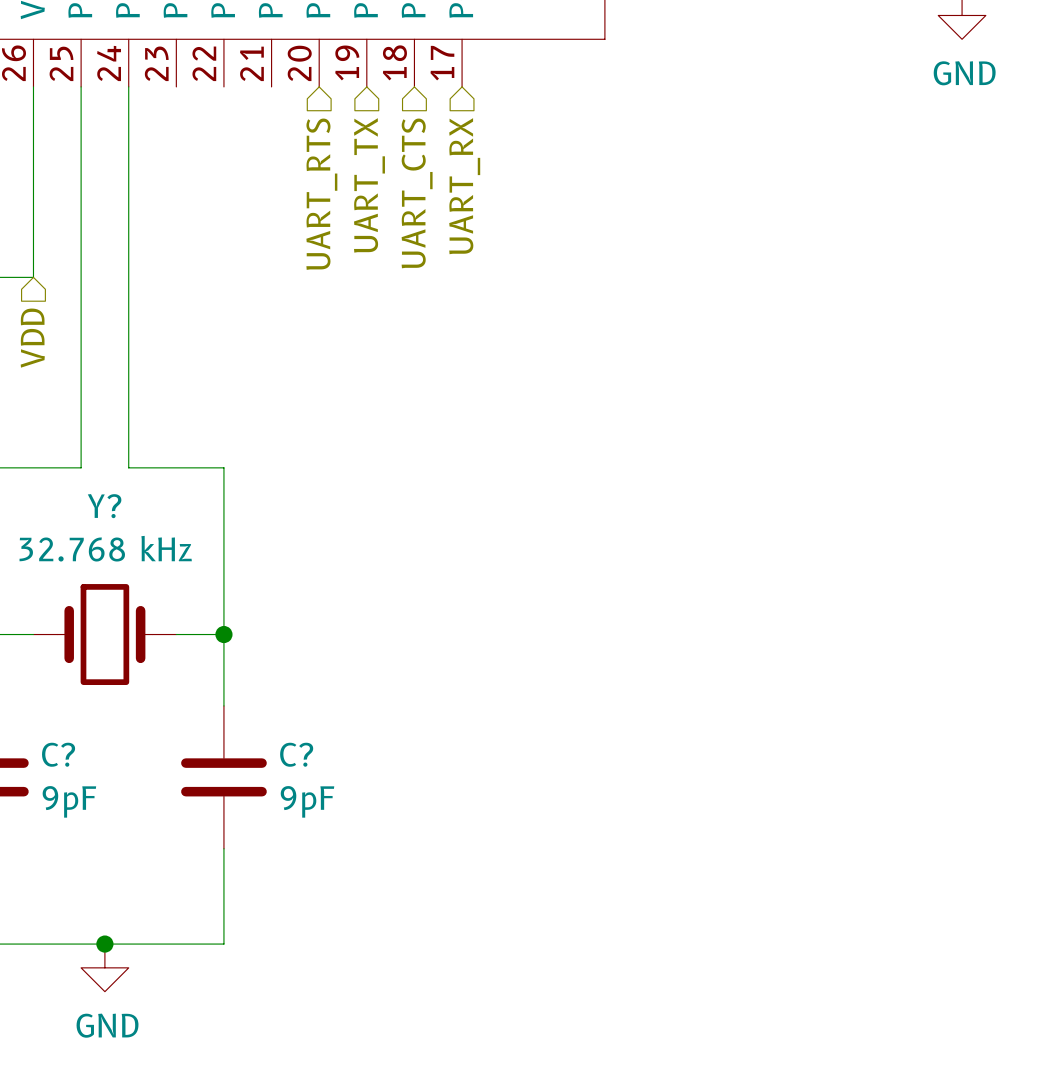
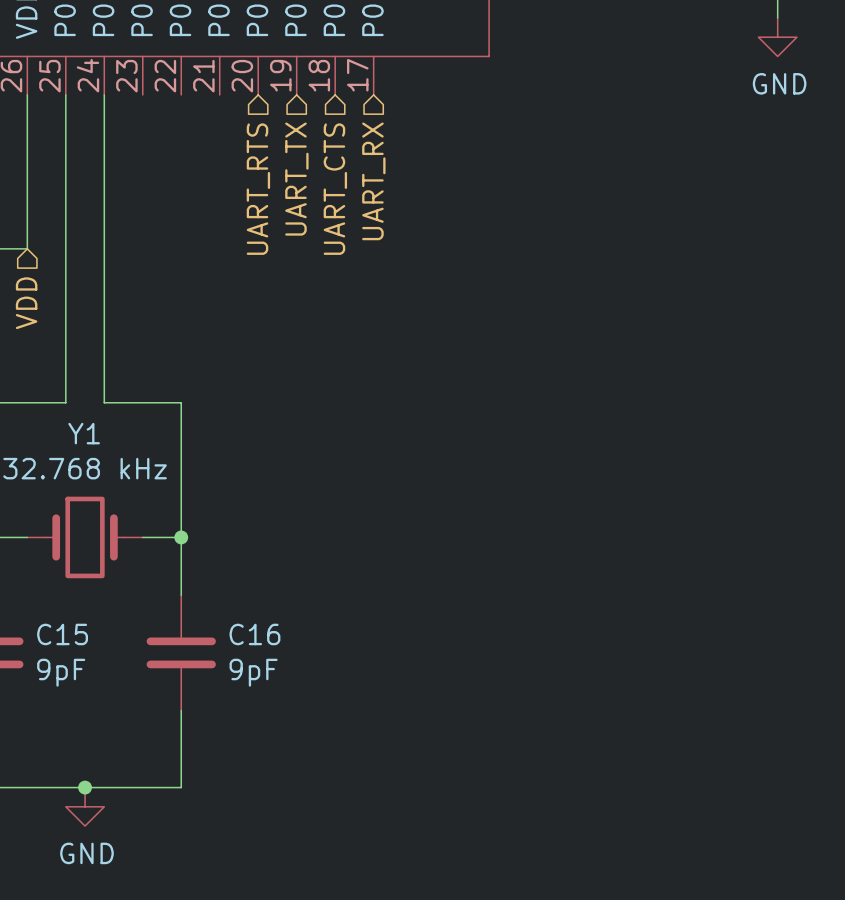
Y? name: Y? (104, 506) -> Y1 (84, 433)
C? name: C? (58, 754) -> C15 (62, 634)
C? name: C? (296, 754) -> C16 (254, 634)

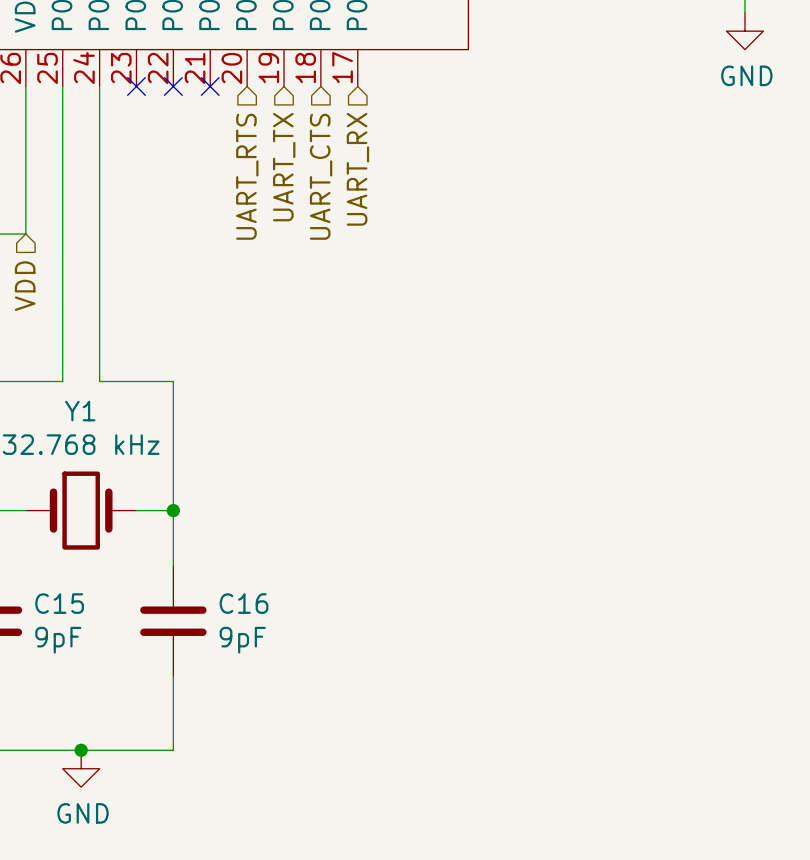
no-connect mark: none -> (136, 86)
no-connect mark: none -> (173, 86)
no-connect mark: none -> (210, 86)

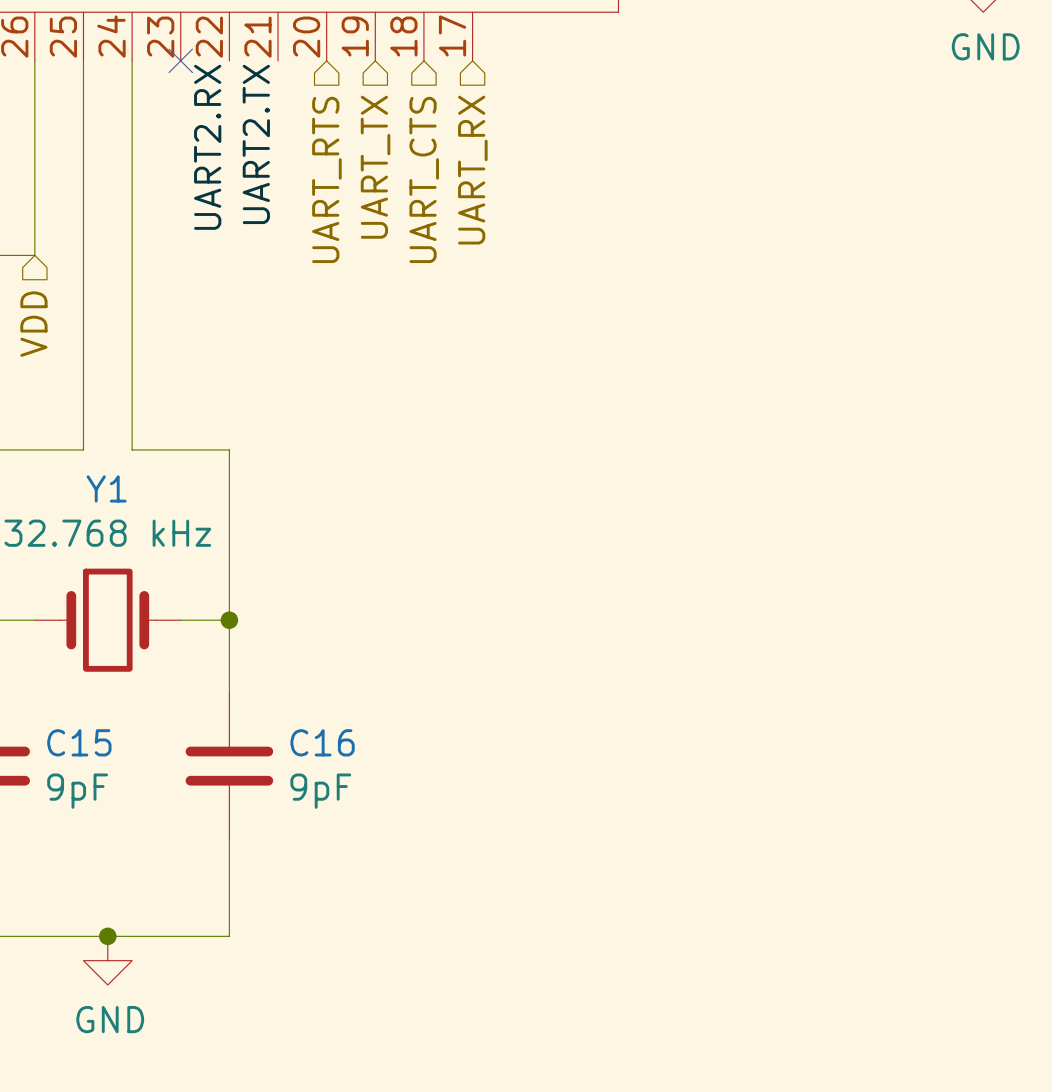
no-connect mark: (173, 86) -> none
no-connect mark: (210, 86) -> none
label: none -> UART2.TX (256, 144)
label: none -> UART2.RX (207, 147)

